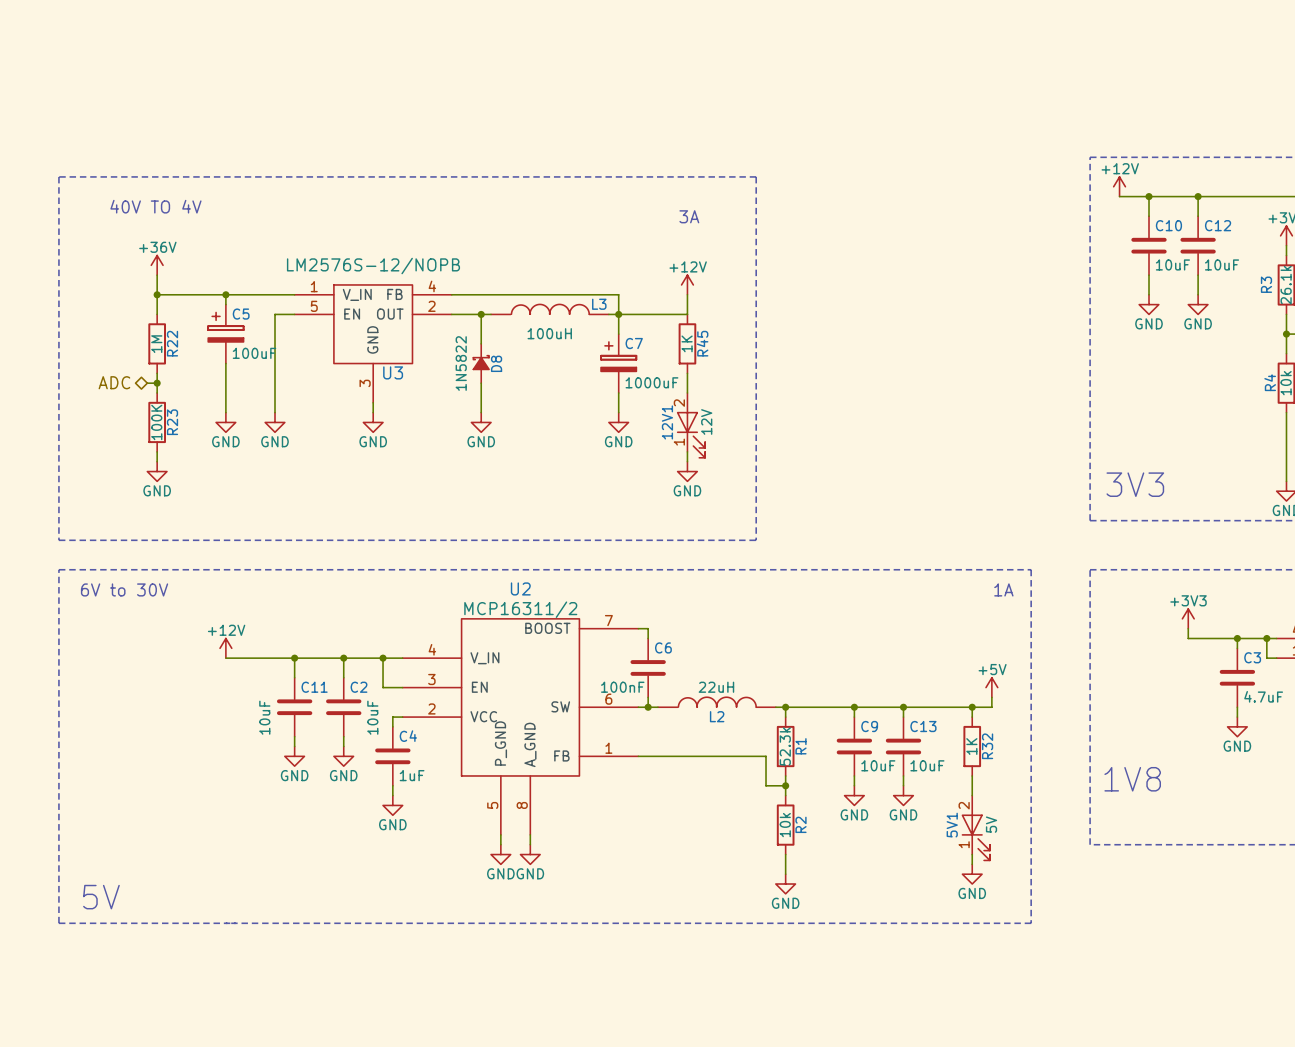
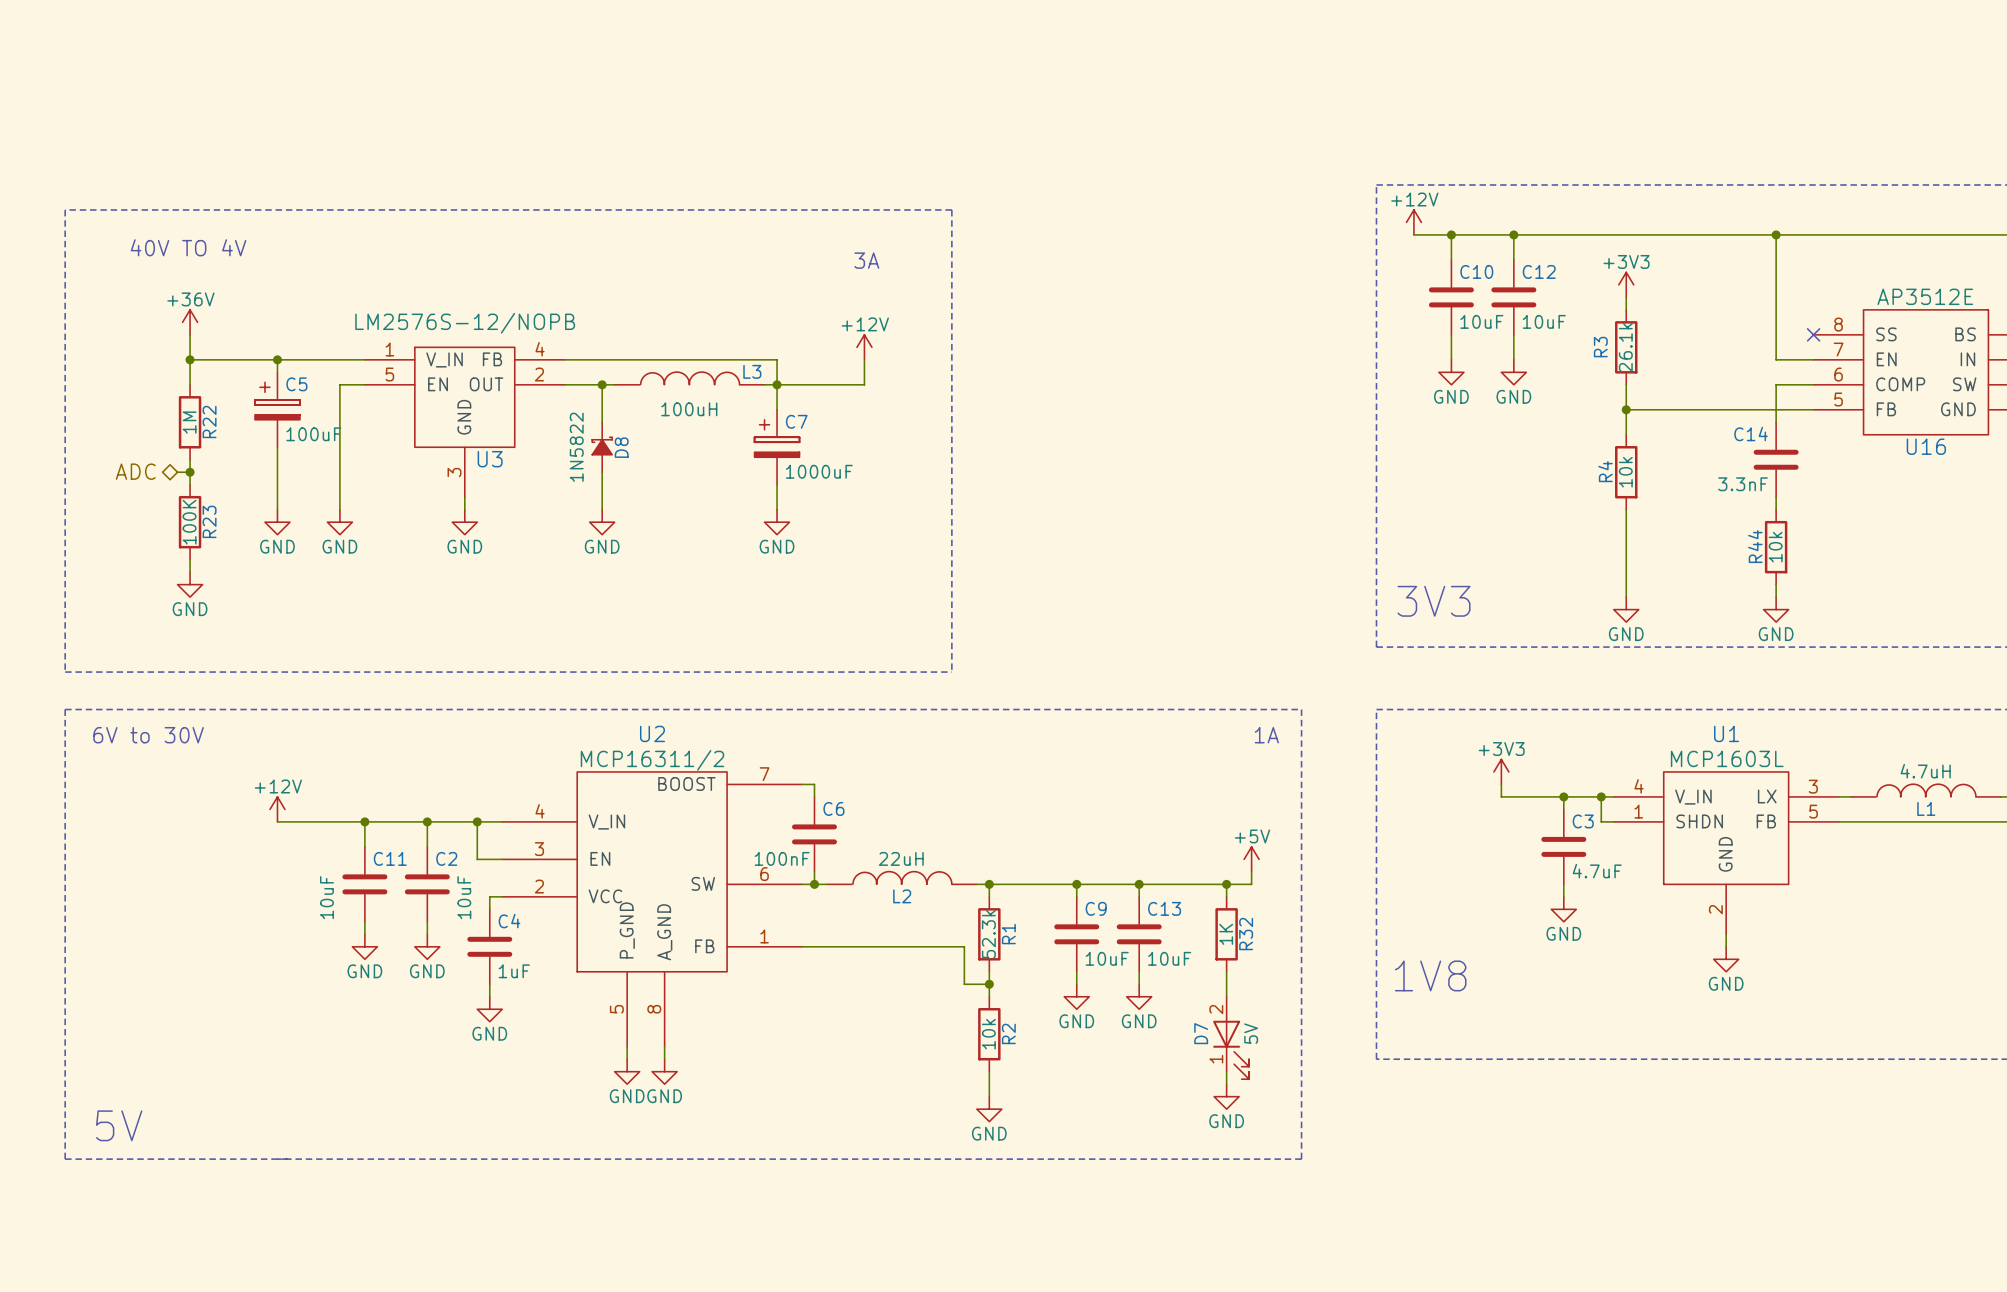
R45: 1K (687, 343) -> none
wire: (687, 373) (687, 392) -> none
12V1: 12V (690, 425) -> none
wire: (687, 451) (687, 461) -> none
power symbol: GND (687, 471) -> none
5V1 name: 5V1 (952, 825) -> D7 (1201, 1033)

